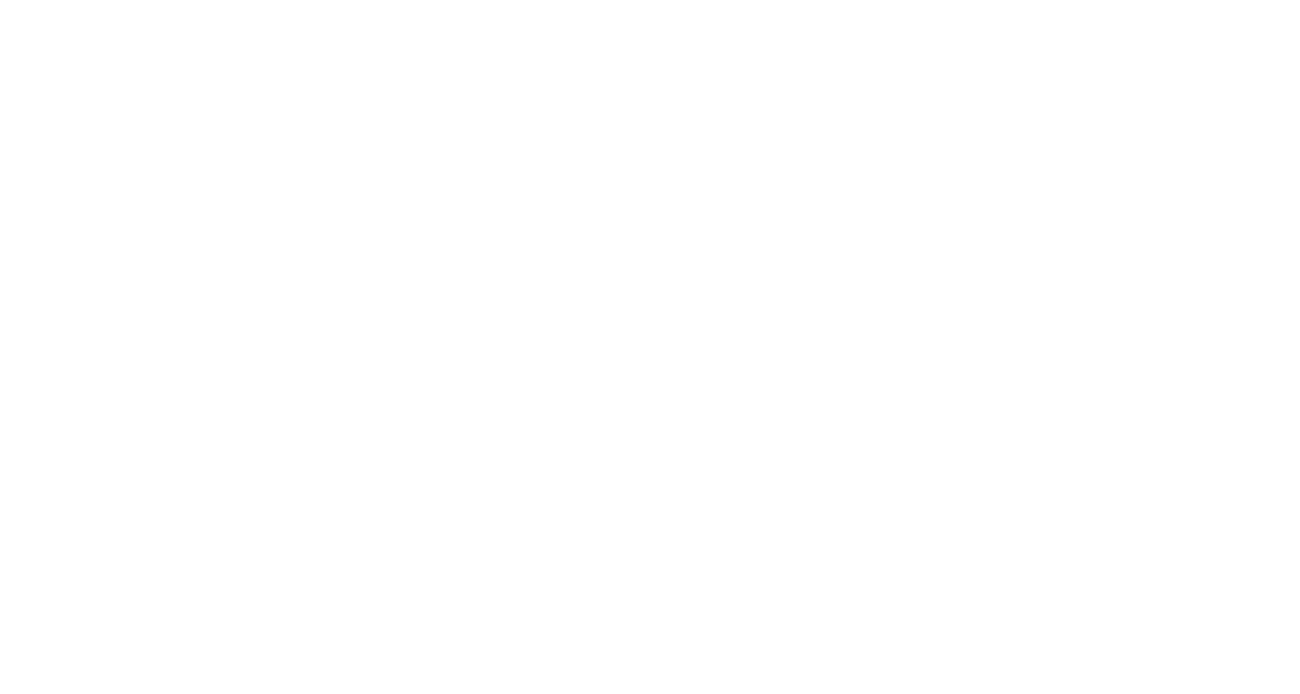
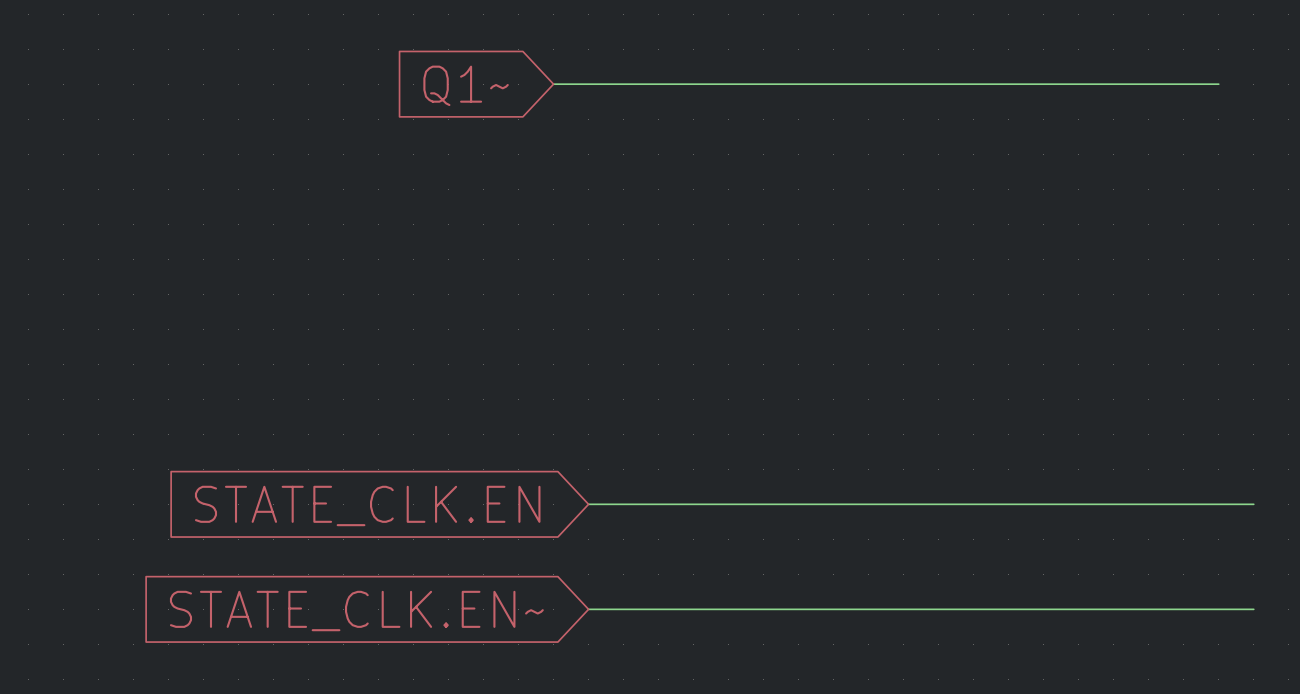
wire: none -> (553, 84) (1218, 84)
global label: none -> Q1~ (466, 85)
wire: none -> (588, 504) (1253, 504)
global label: none -> STATE_CLK.EN (367, 505)
wire: none -> (588, 609) (1253, 609)
global label: none -> STATE_CLK.EN~ (356, 611)

